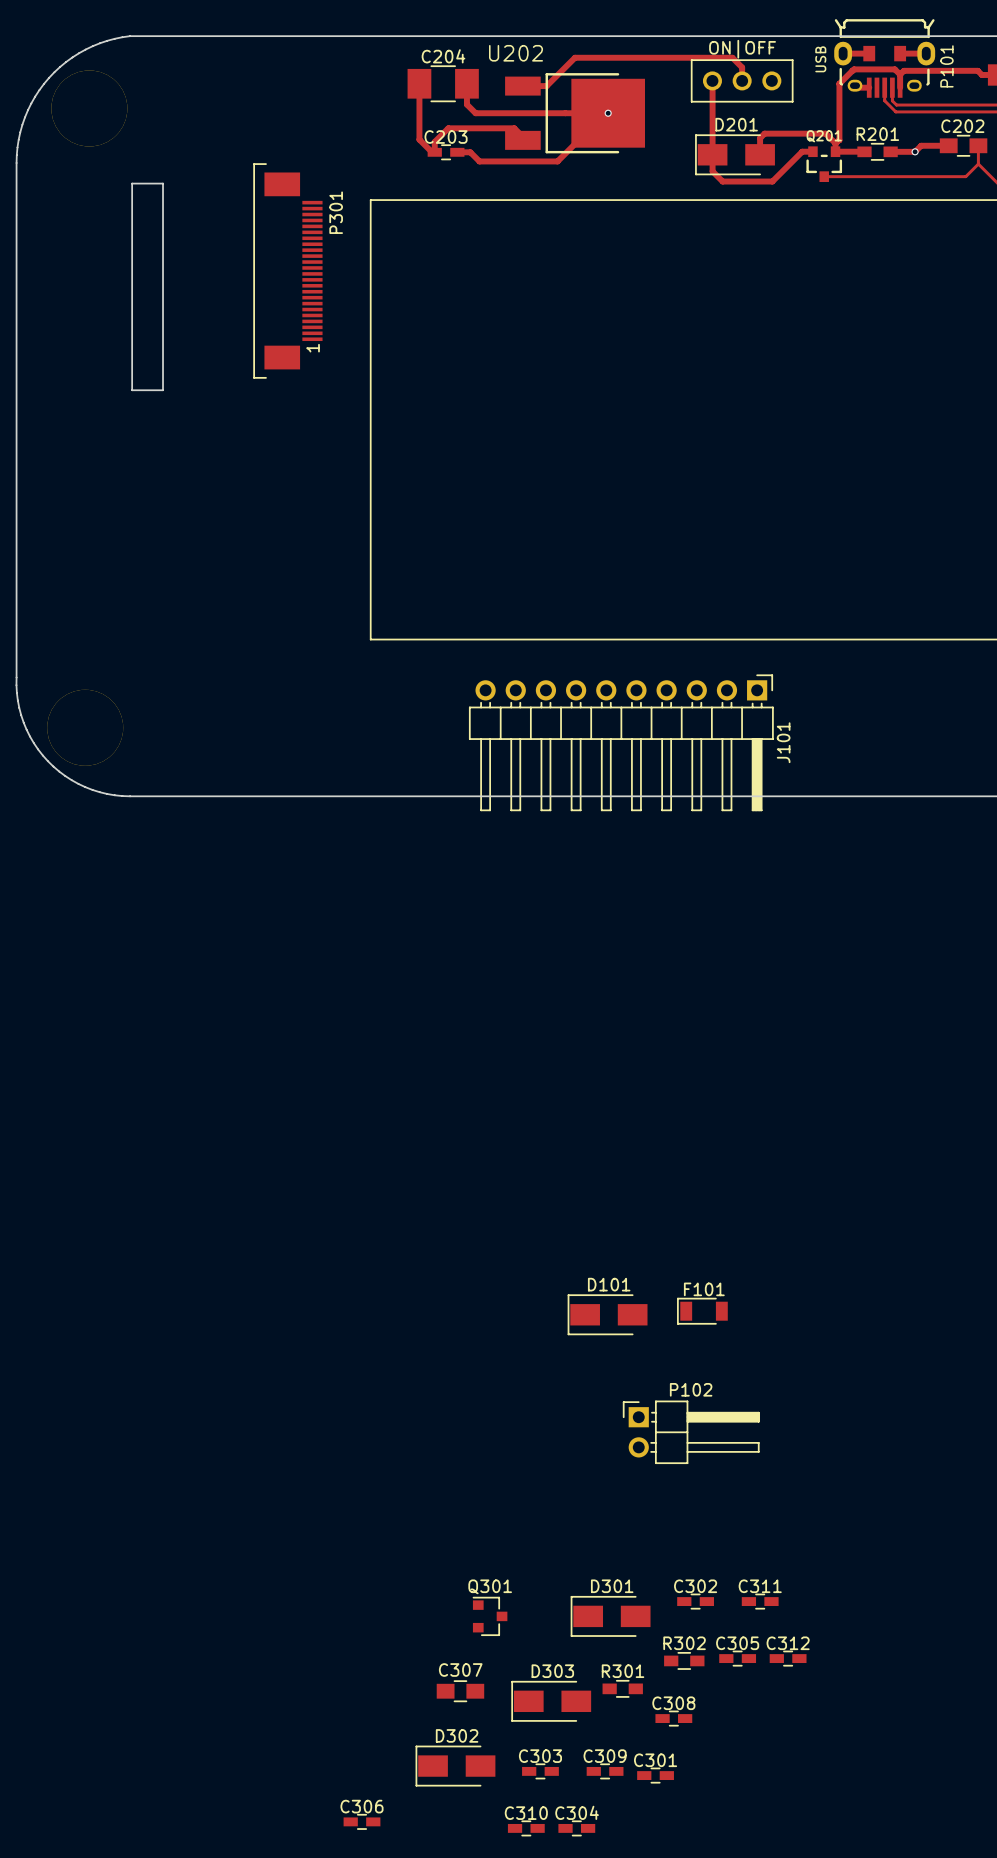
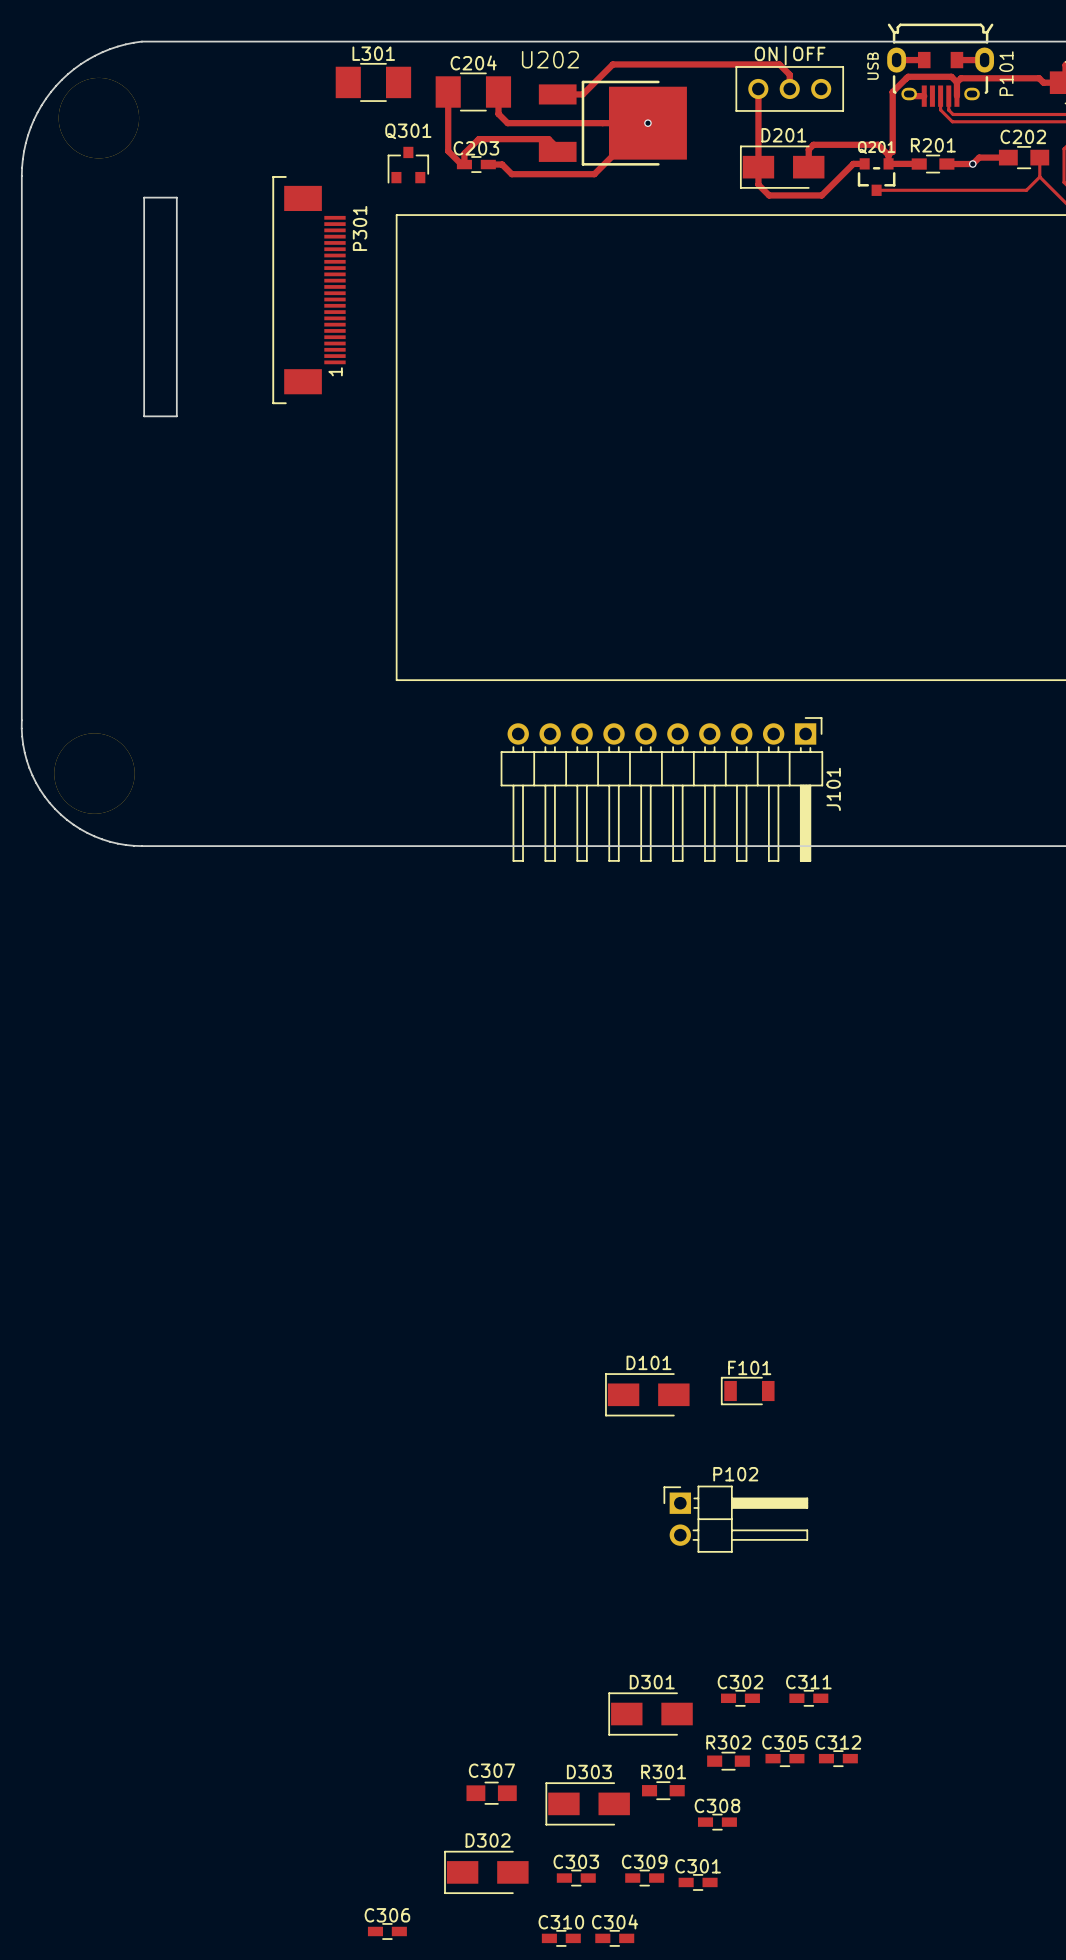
L301: none -> (373, 82)
Q301 rotation: 0° (490, 1616) -> 90° counterclockwise (408, 165)
Q301 position: (490, 1616) -> (408, 165)

